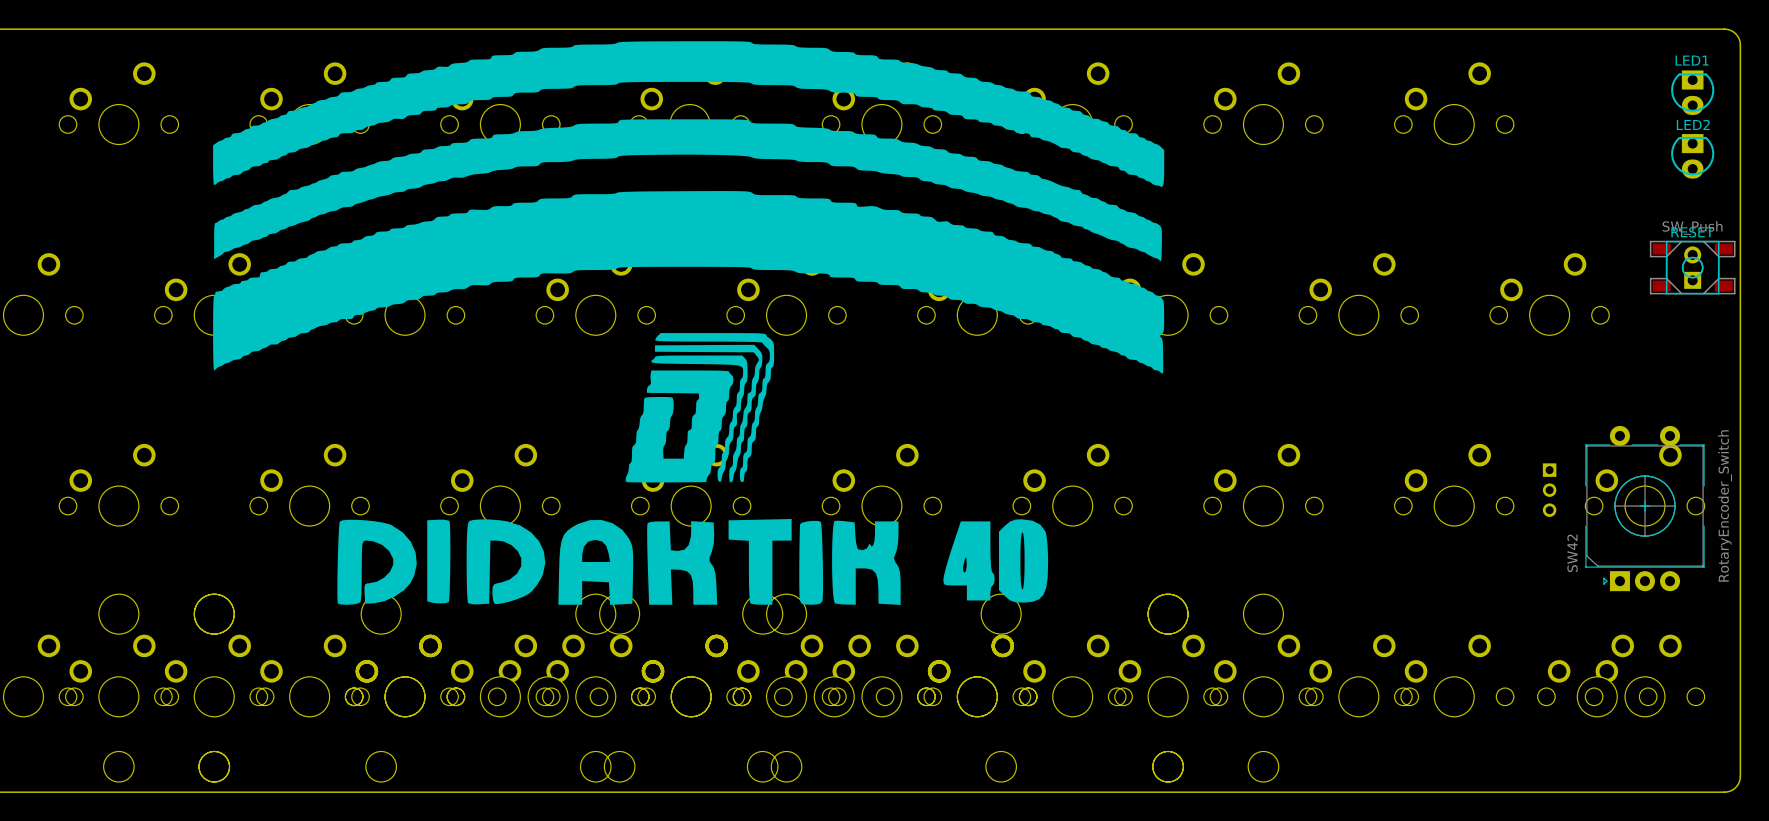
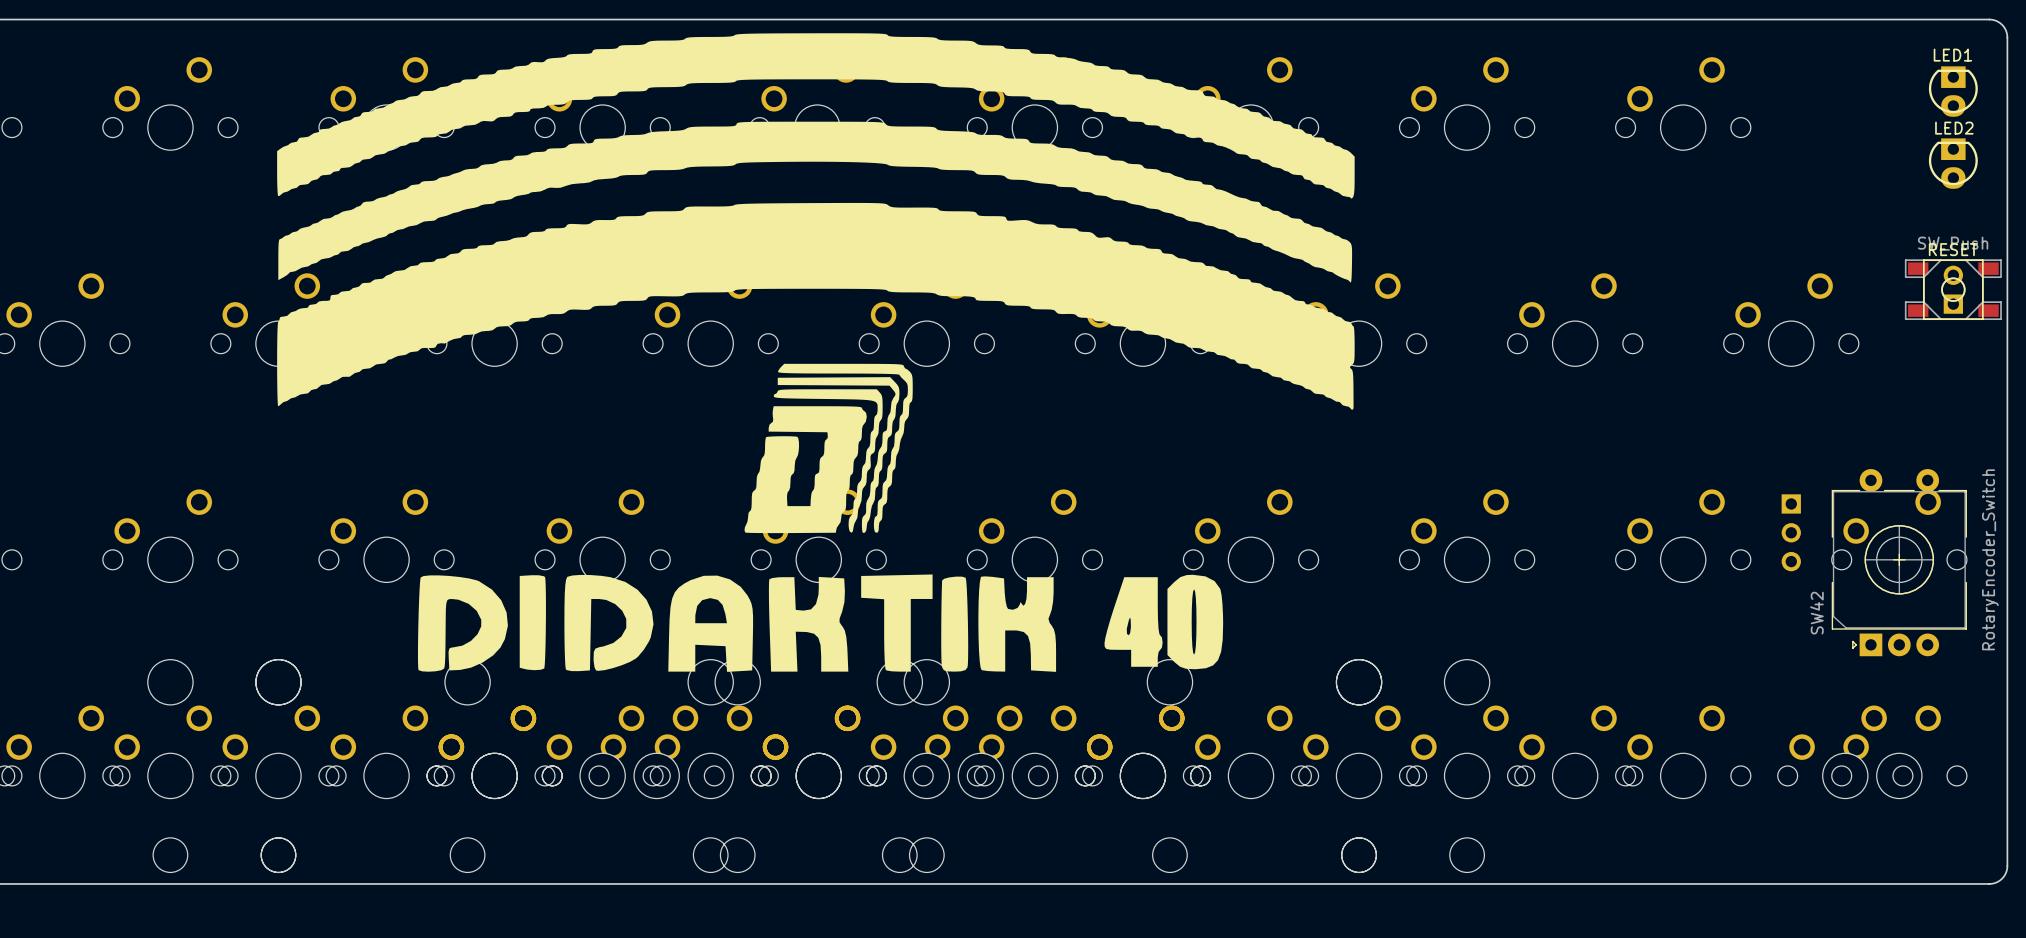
part footprint: [1542, 463, 1557, 517] -> [1781, 494, 1801, 572]

